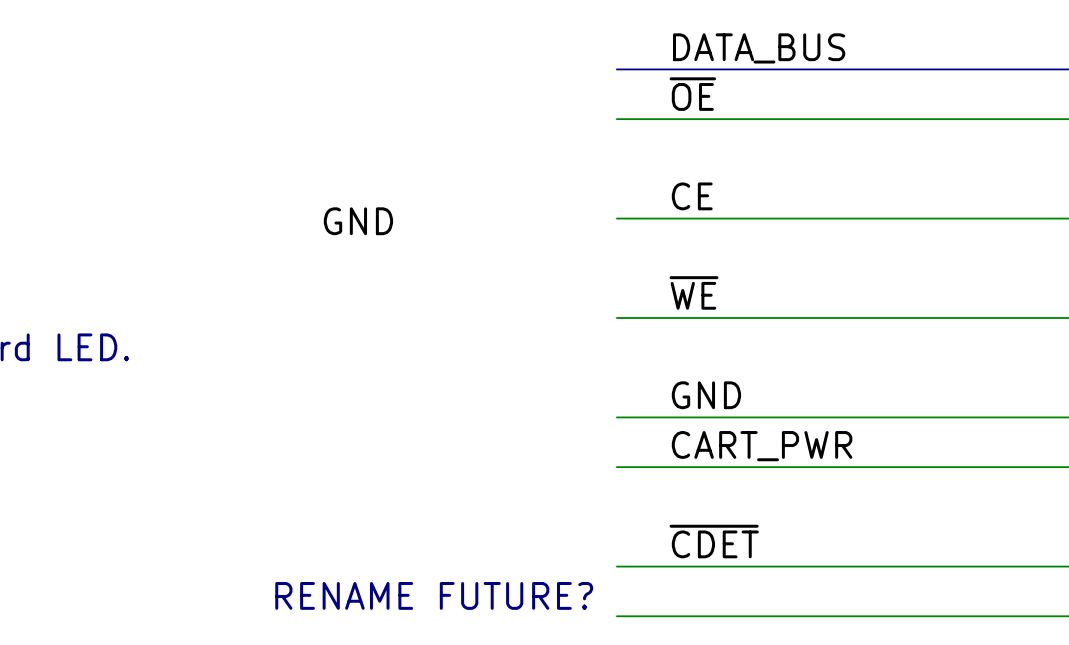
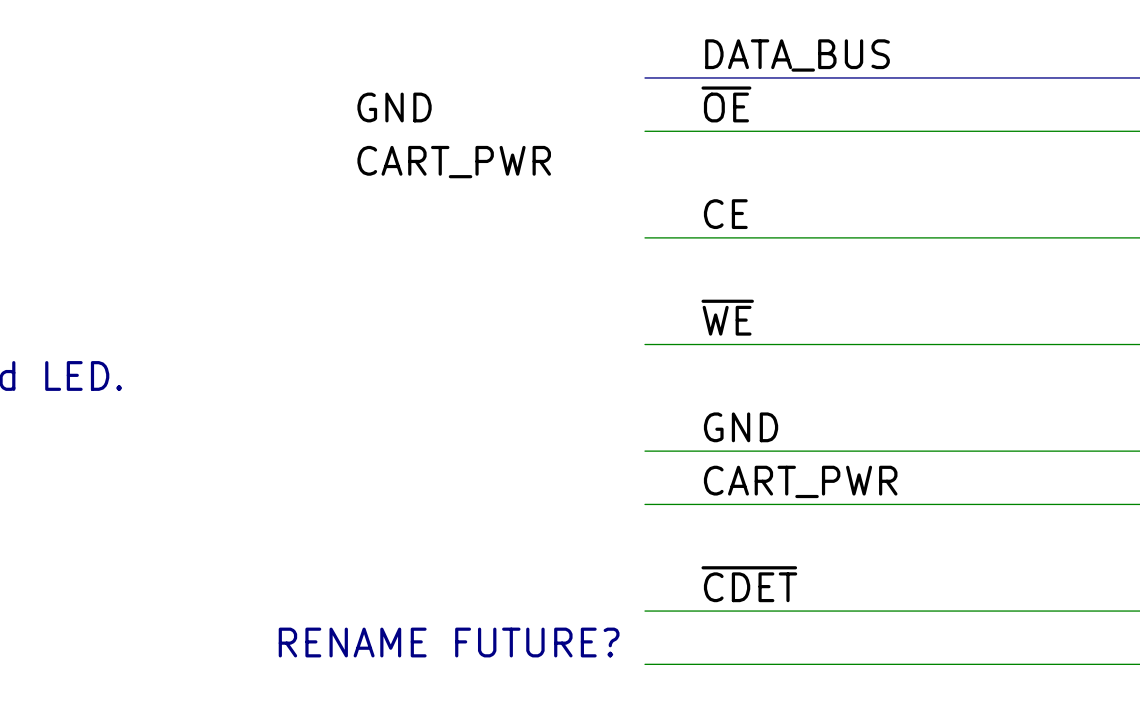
label: none -> CART_PWR (454, 162)
label position: GND (358, 221) -> GND (394, 107)

